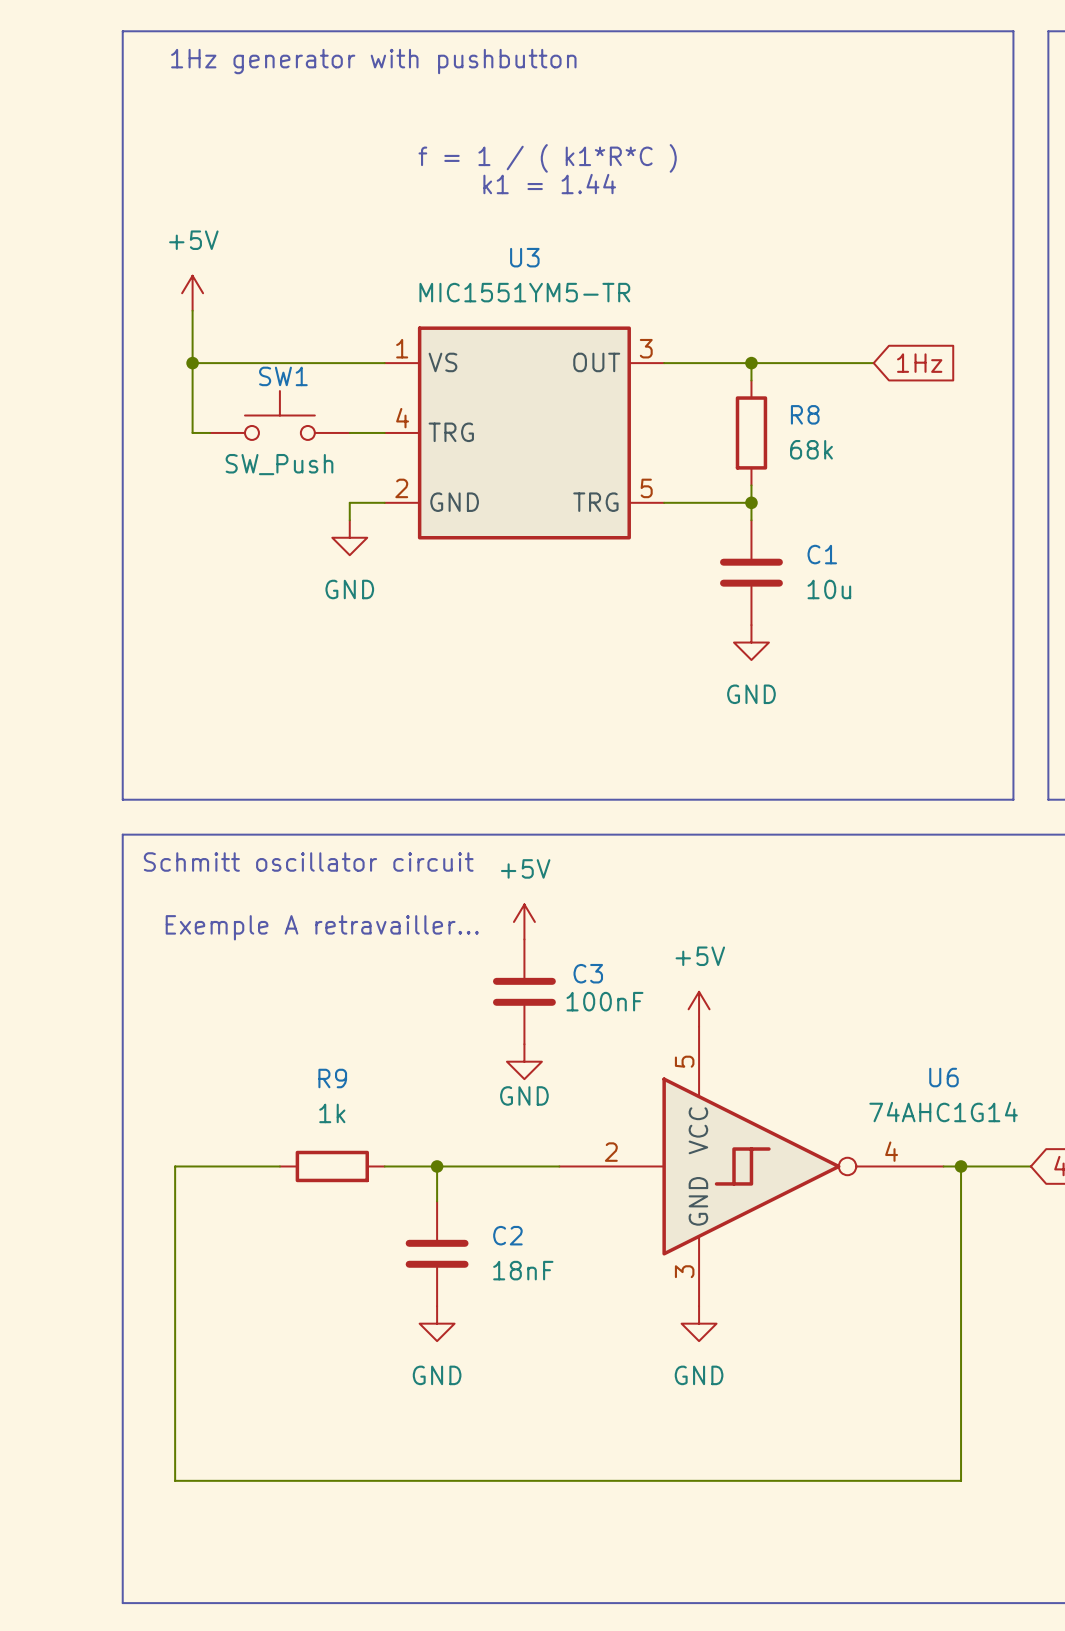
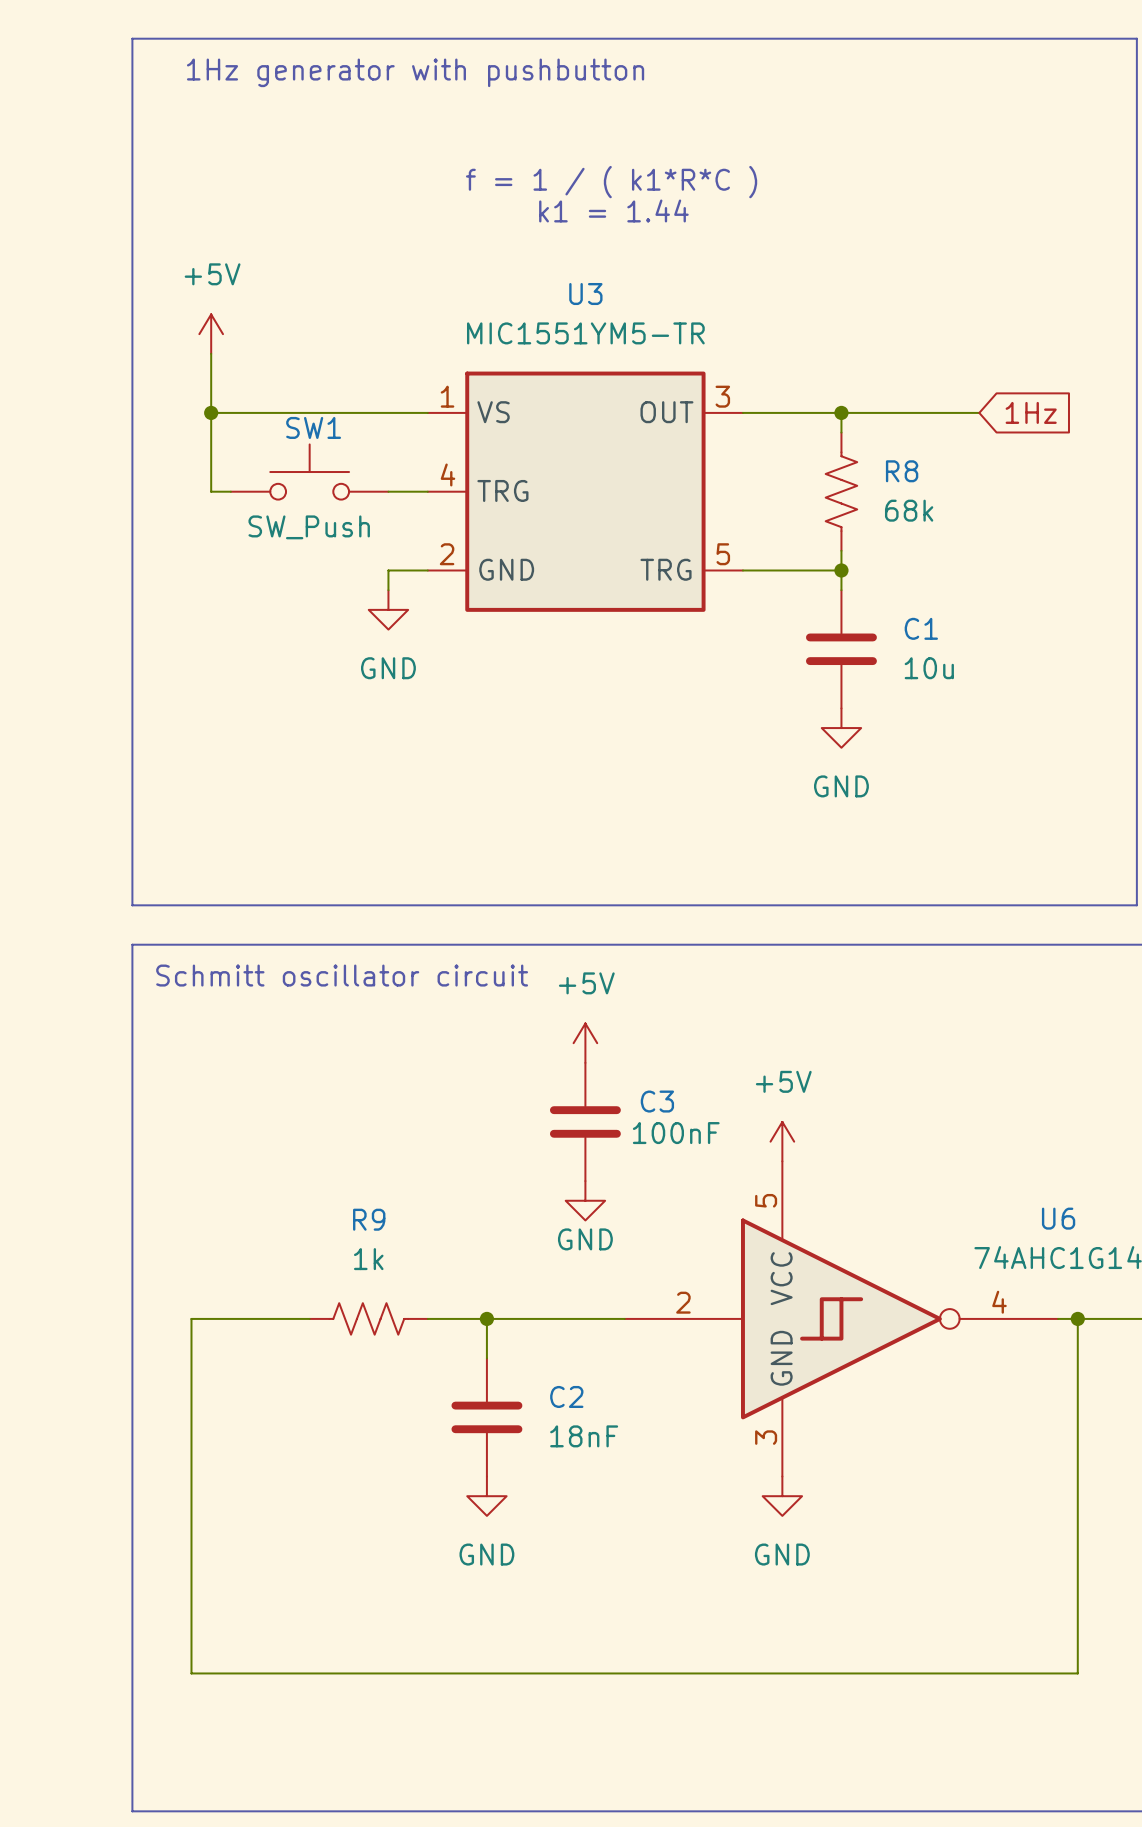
R8 symbol: [735, 380, 768, 486] -> [825, 432, 858, 551]
text: Exemple A retravailler... (322, 927) -> none
R9 symbol: [279, 1150, 385, 1183] -> [309, 1303, 428, 1335]

